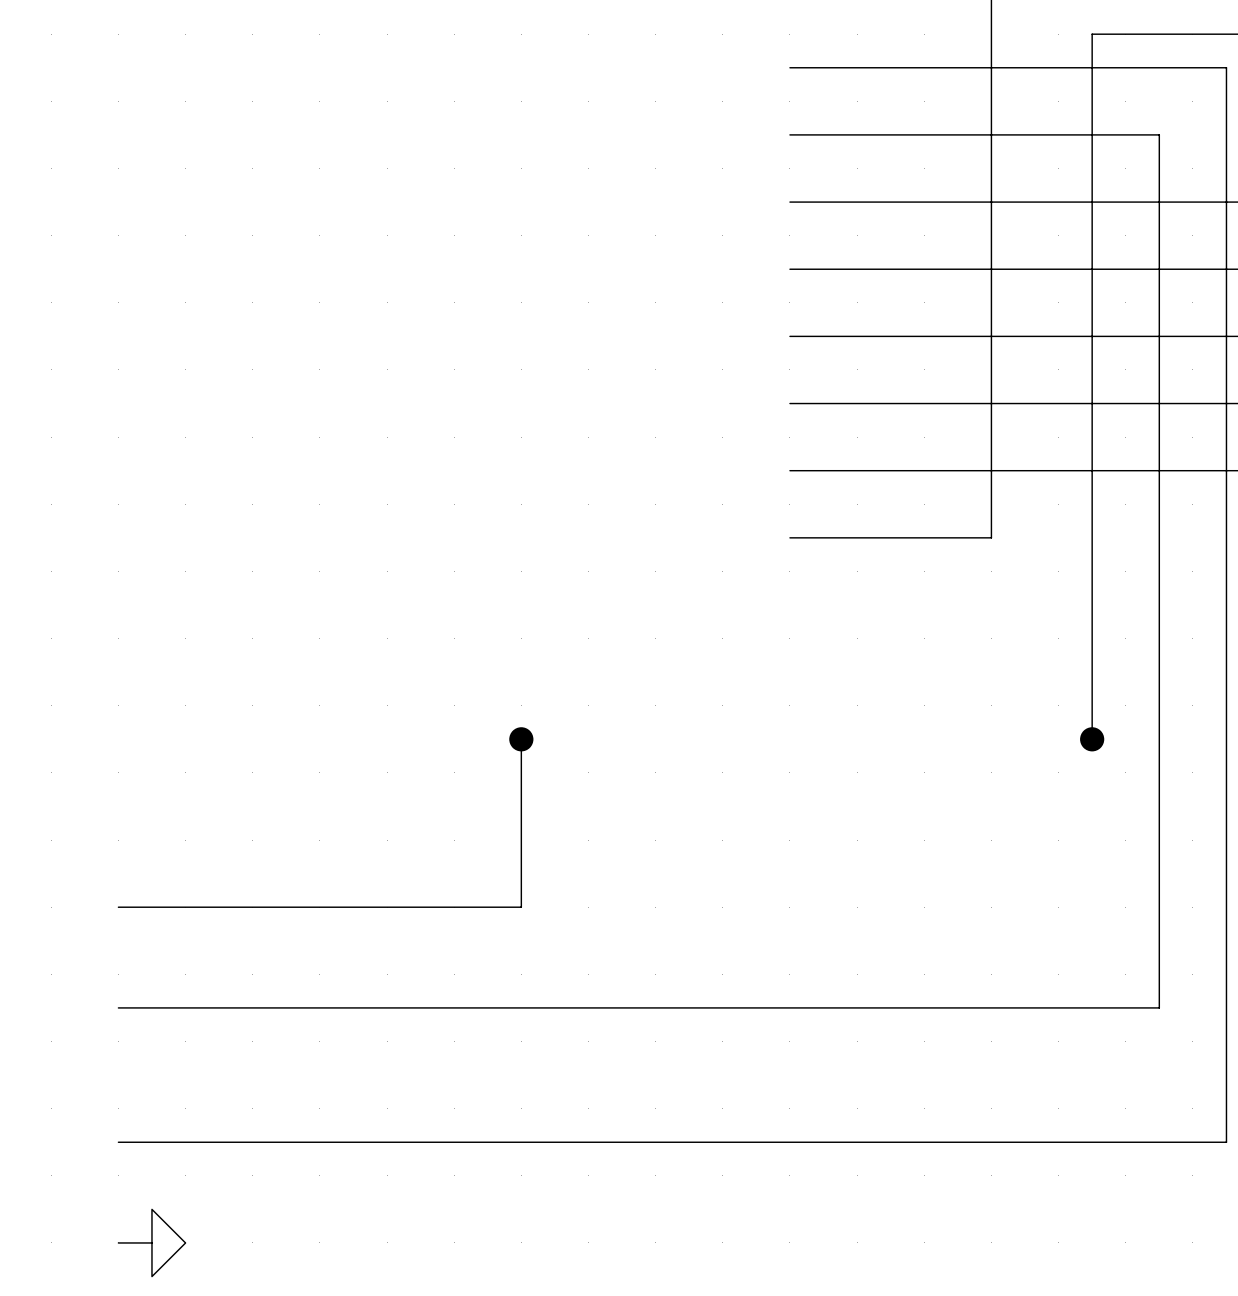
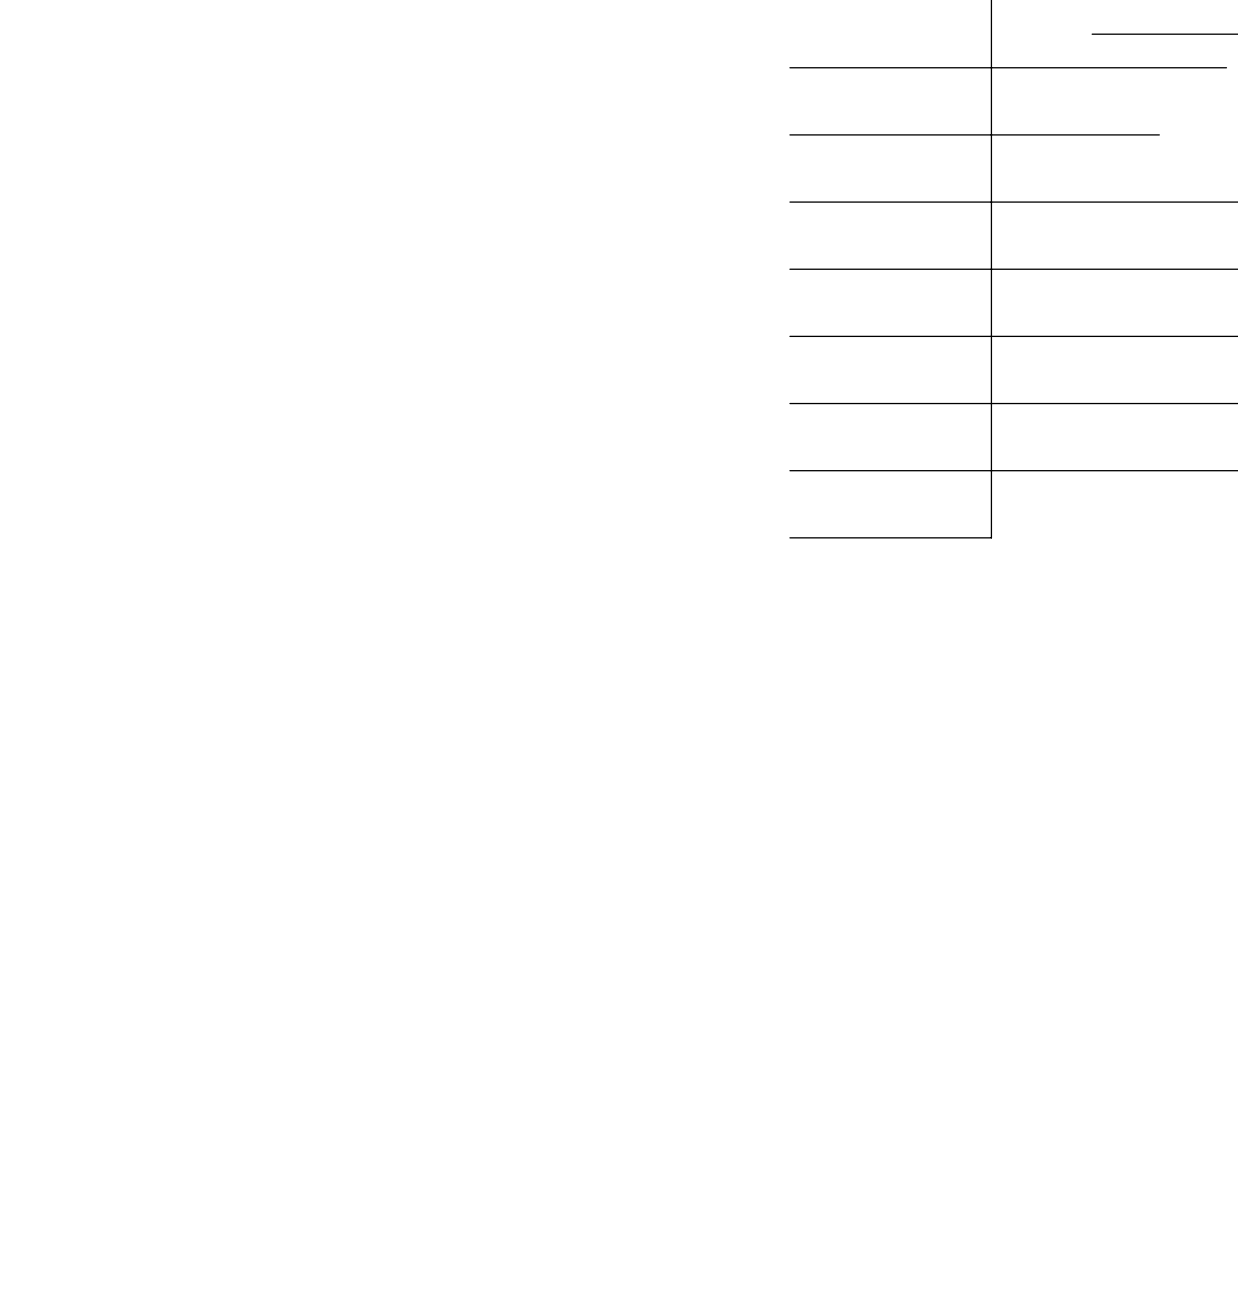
wire: (1092, 34) (1092, 739) -> none
wire: (1226, 67) (1226, 1142) (118, 1142) -> none
wire: (1159, 134) (1159, 1007) (118, 1007) -> none
wire: (521, 739) (521, 907) (118, 907) -> none
junction: (521, 739) -> none
junction: (1092, 739) -> none
power symbol: (151, 1242) -> none

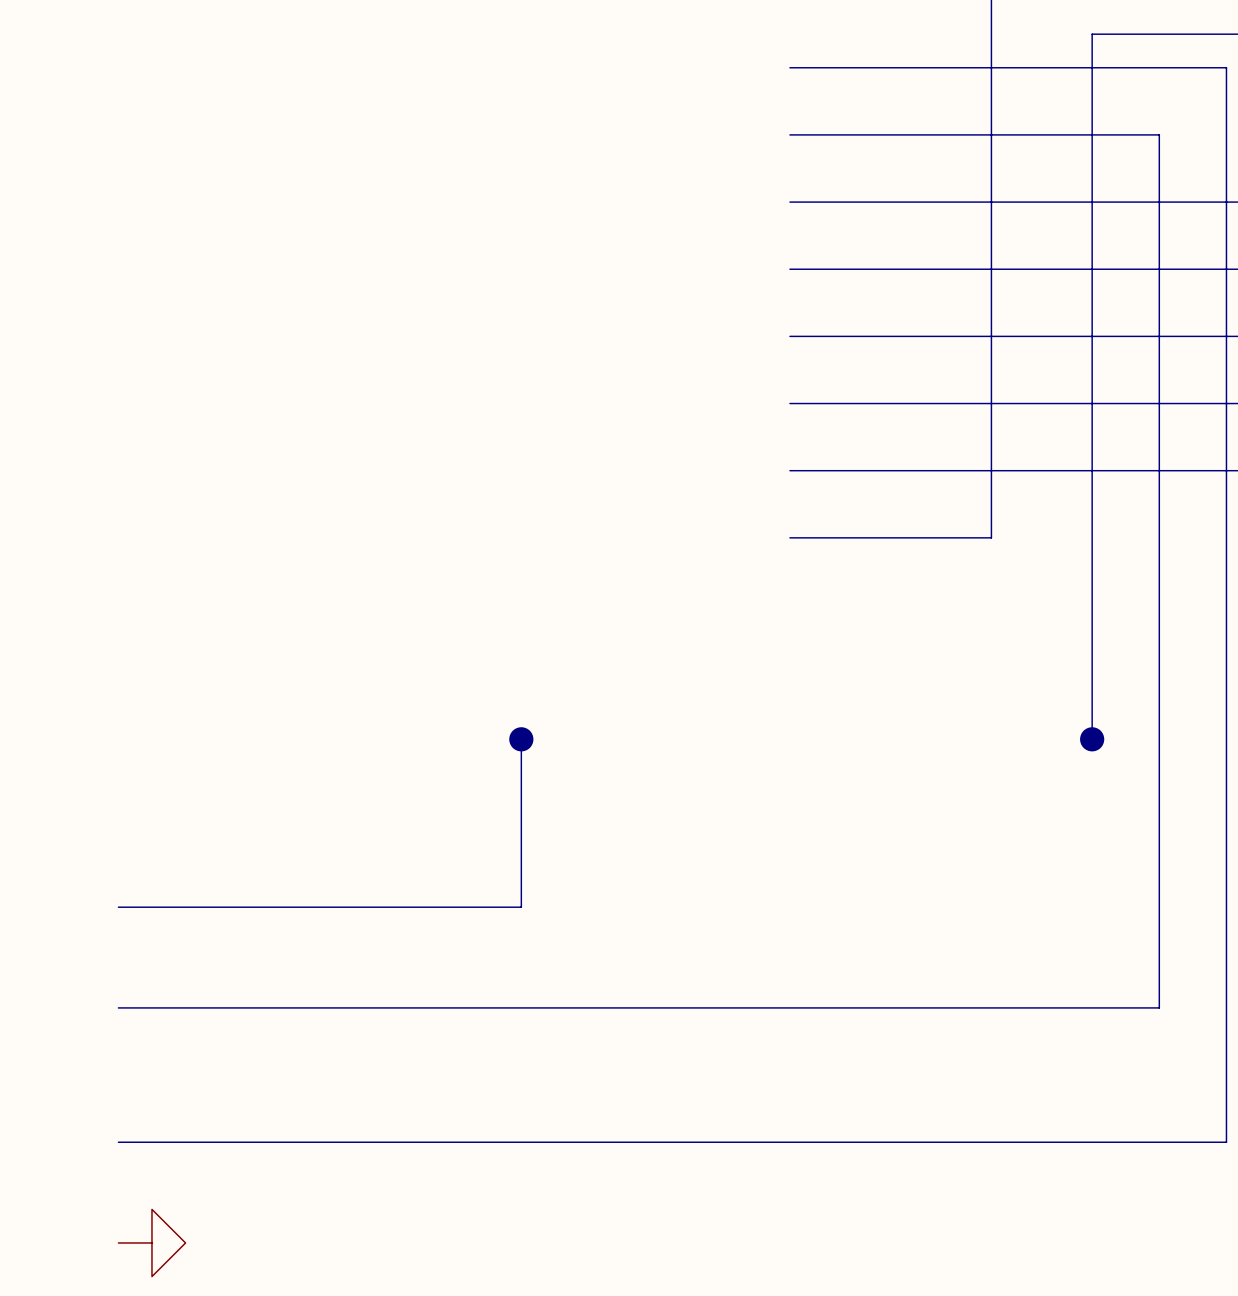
wire: none -> (1092, 34) (1092, 739)
wire: none -> (1226, 67) (1226, 1142) (118, 1142)
wire: none -> (1159, 134) (1159, 1007) (118, 1007)
wire: none -> (521, 739) (521, 907) (118, 907)
junction: none -> (521, 739)
junction: none -> (1092, 739)
power symbol: none -> (151, 1242)

